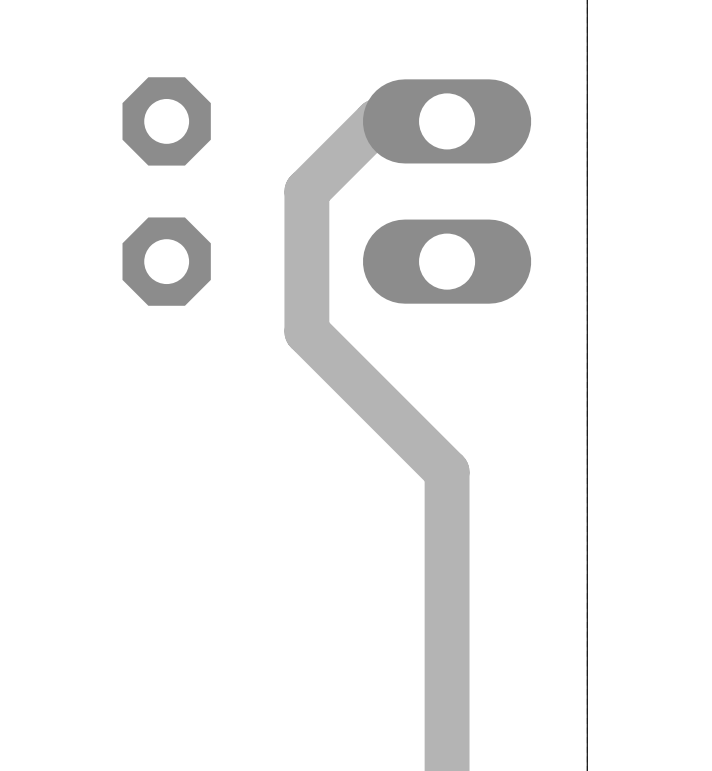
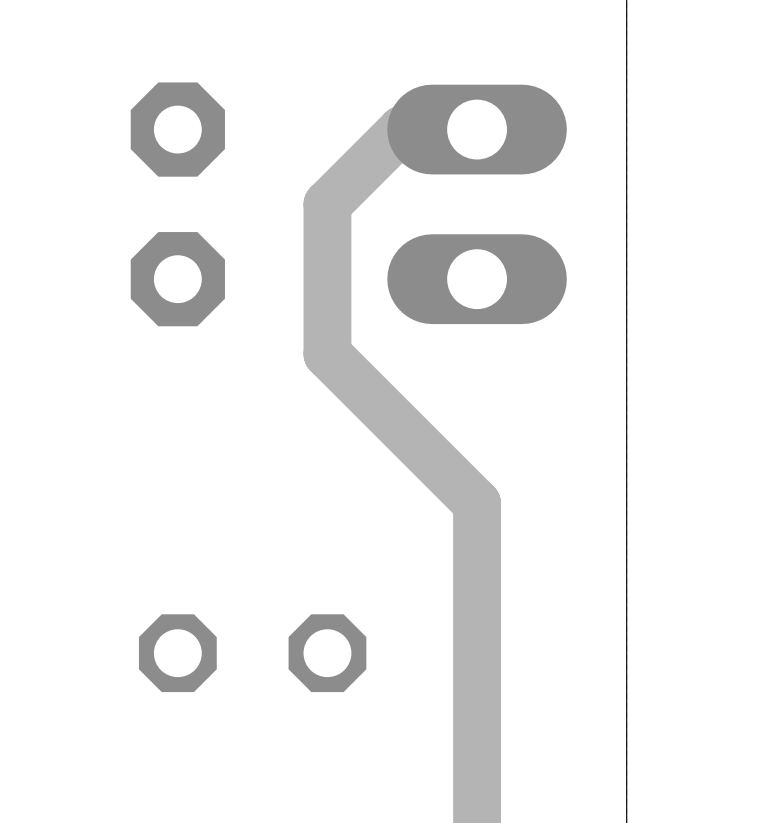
part: none -> (252, 653)

